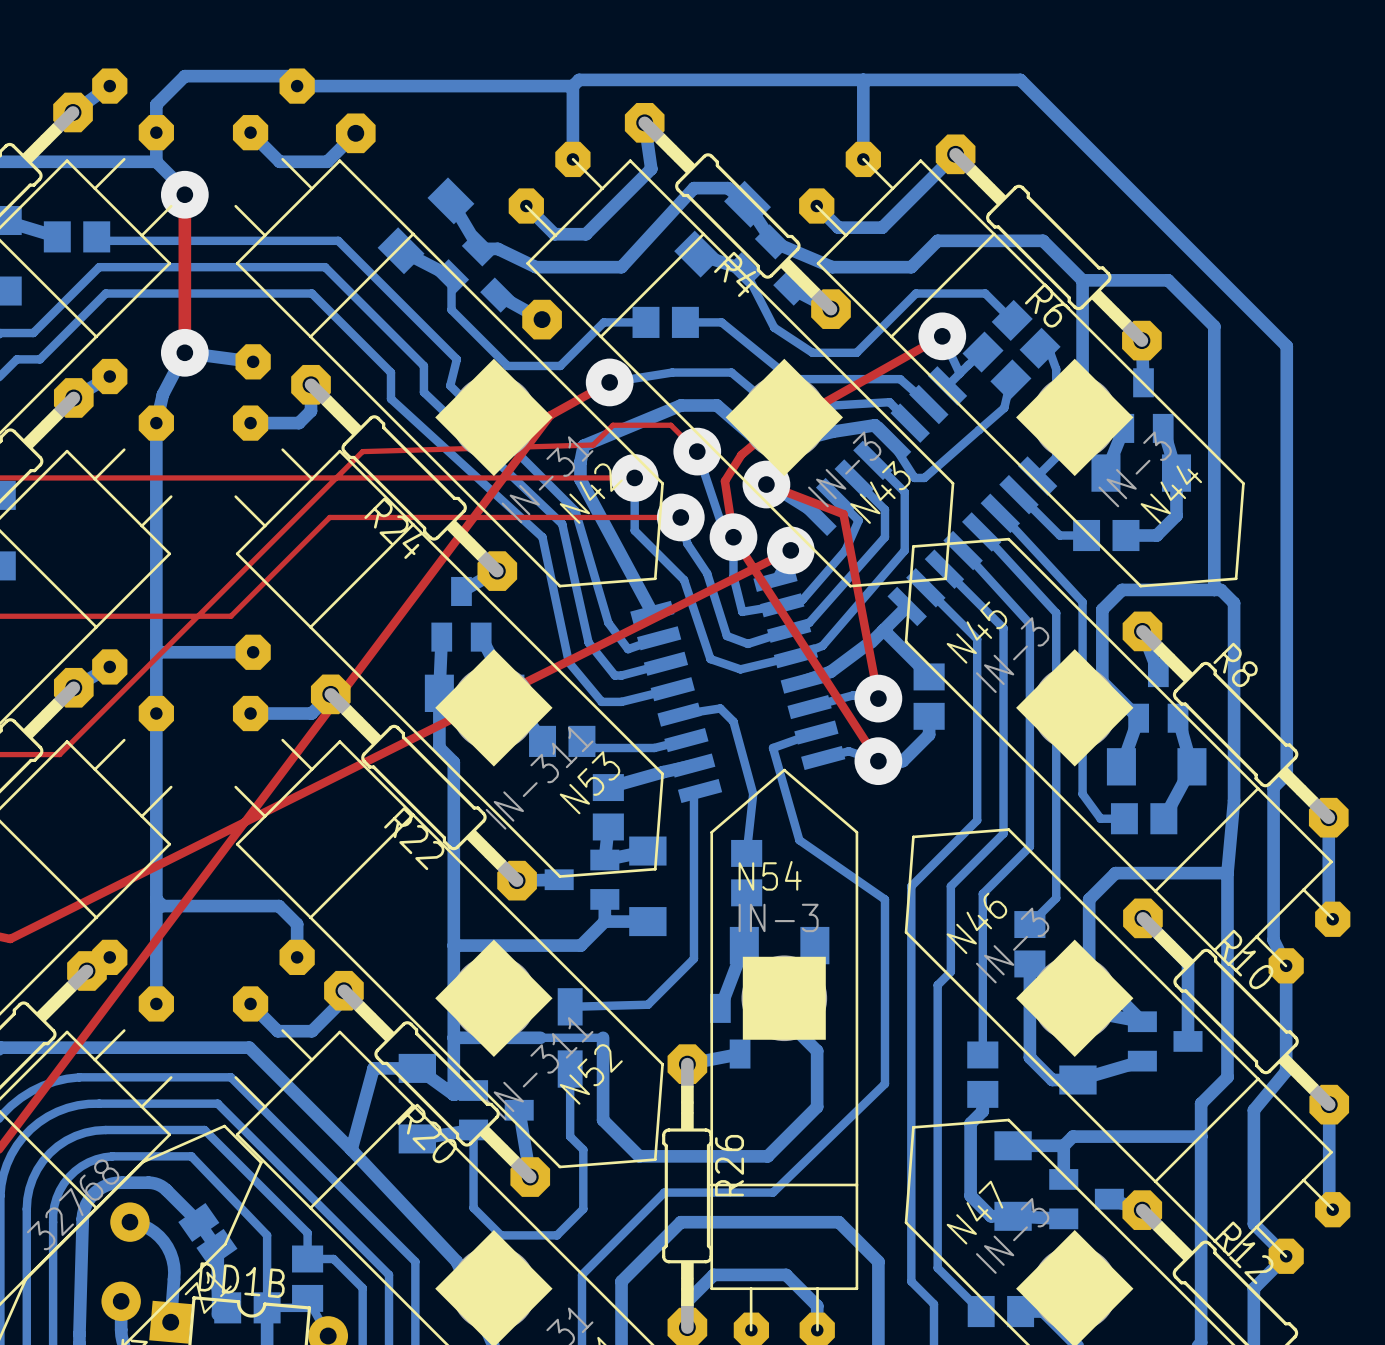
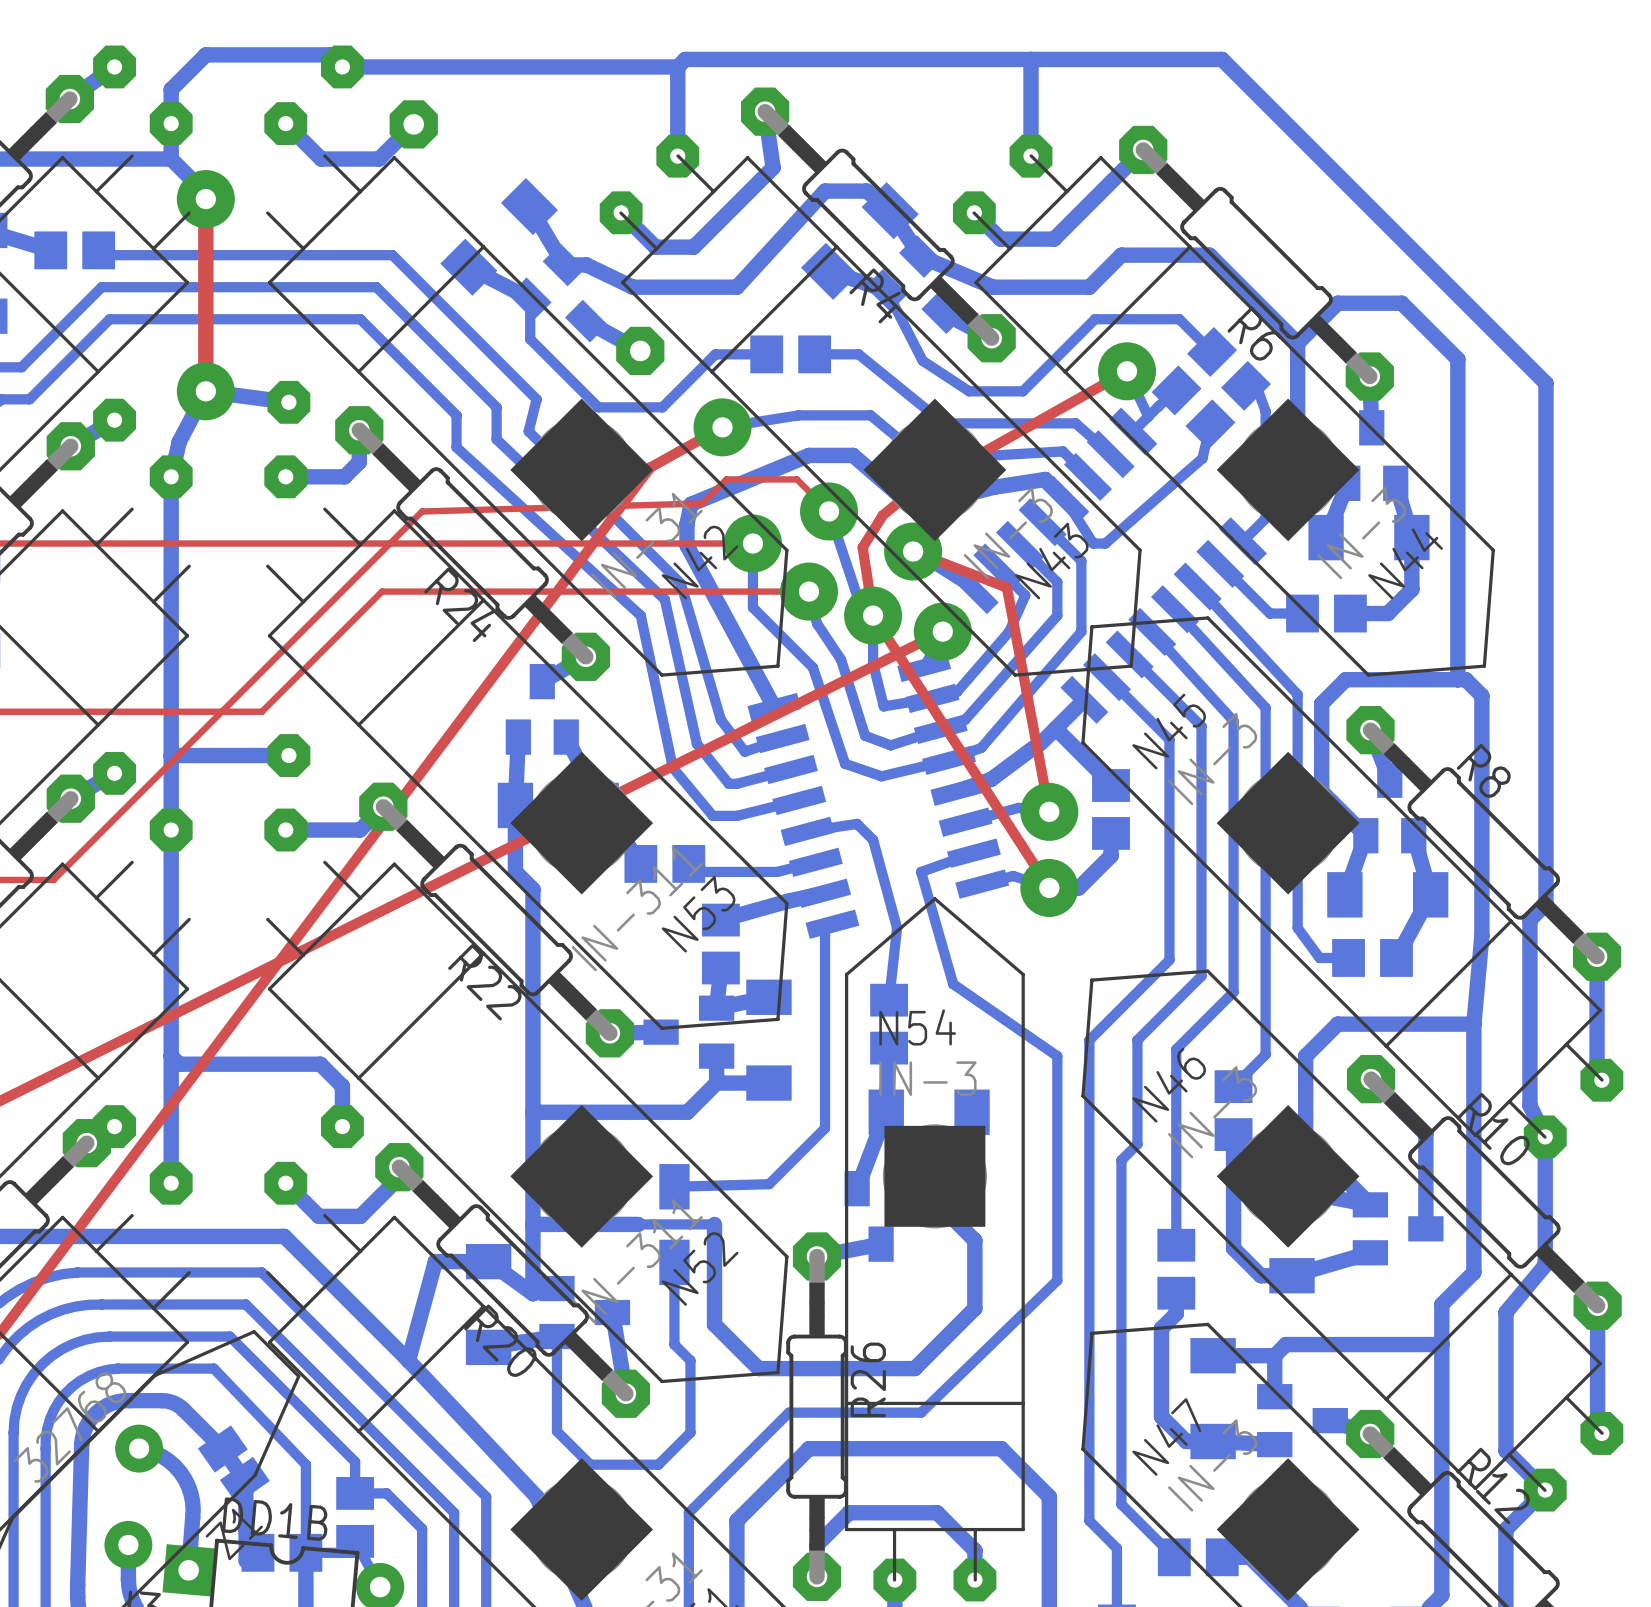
bottom track: (1010, 240) (1043, 240) (1082, 280) -> (1209, 255) (1297, 343) (1337, 303)
bottom track: (1082, 280) (1082, 313) -> none
bottom track: (1082, 280) (1115, 280) -> none

